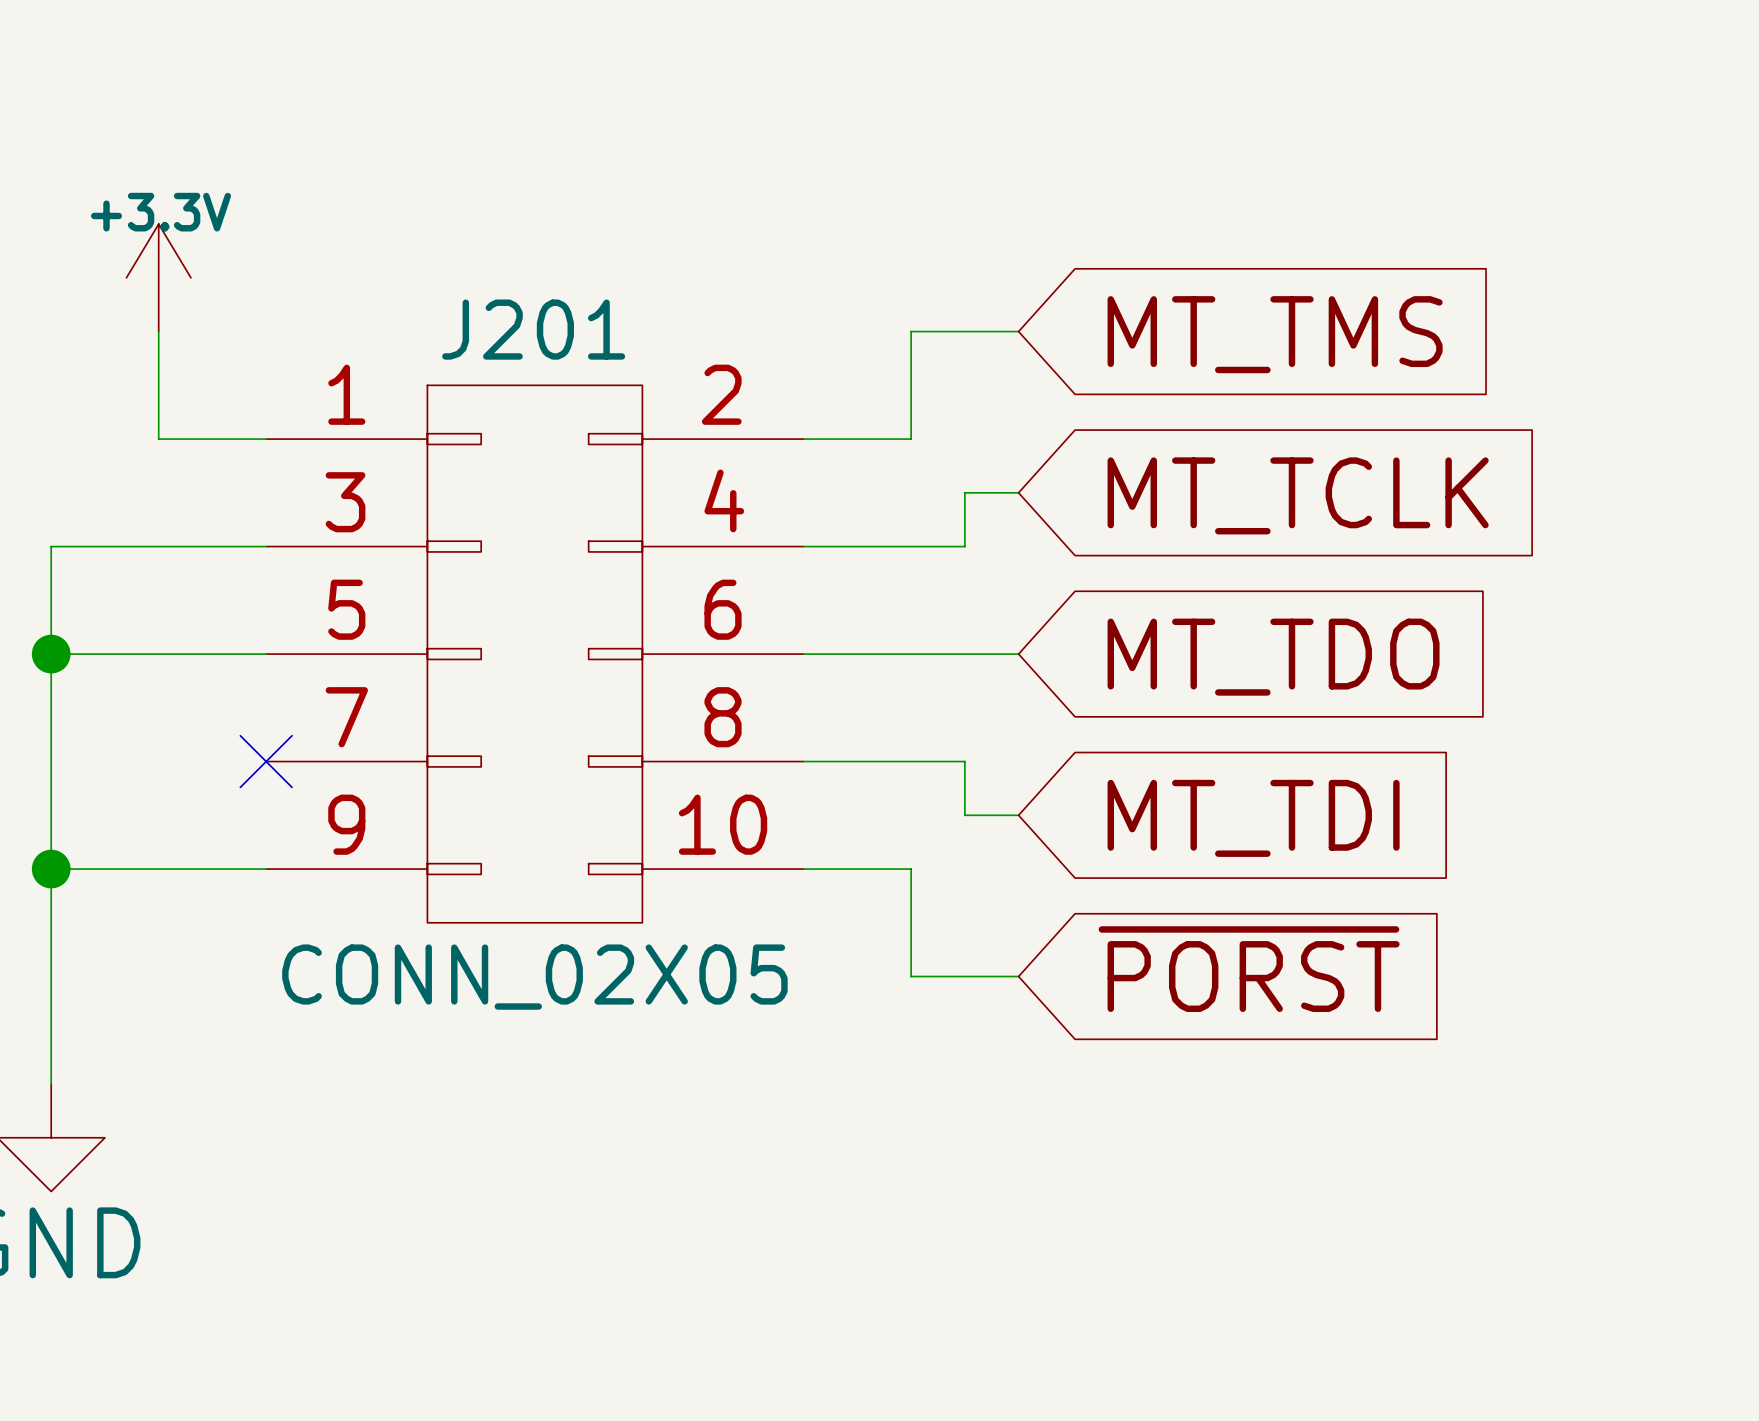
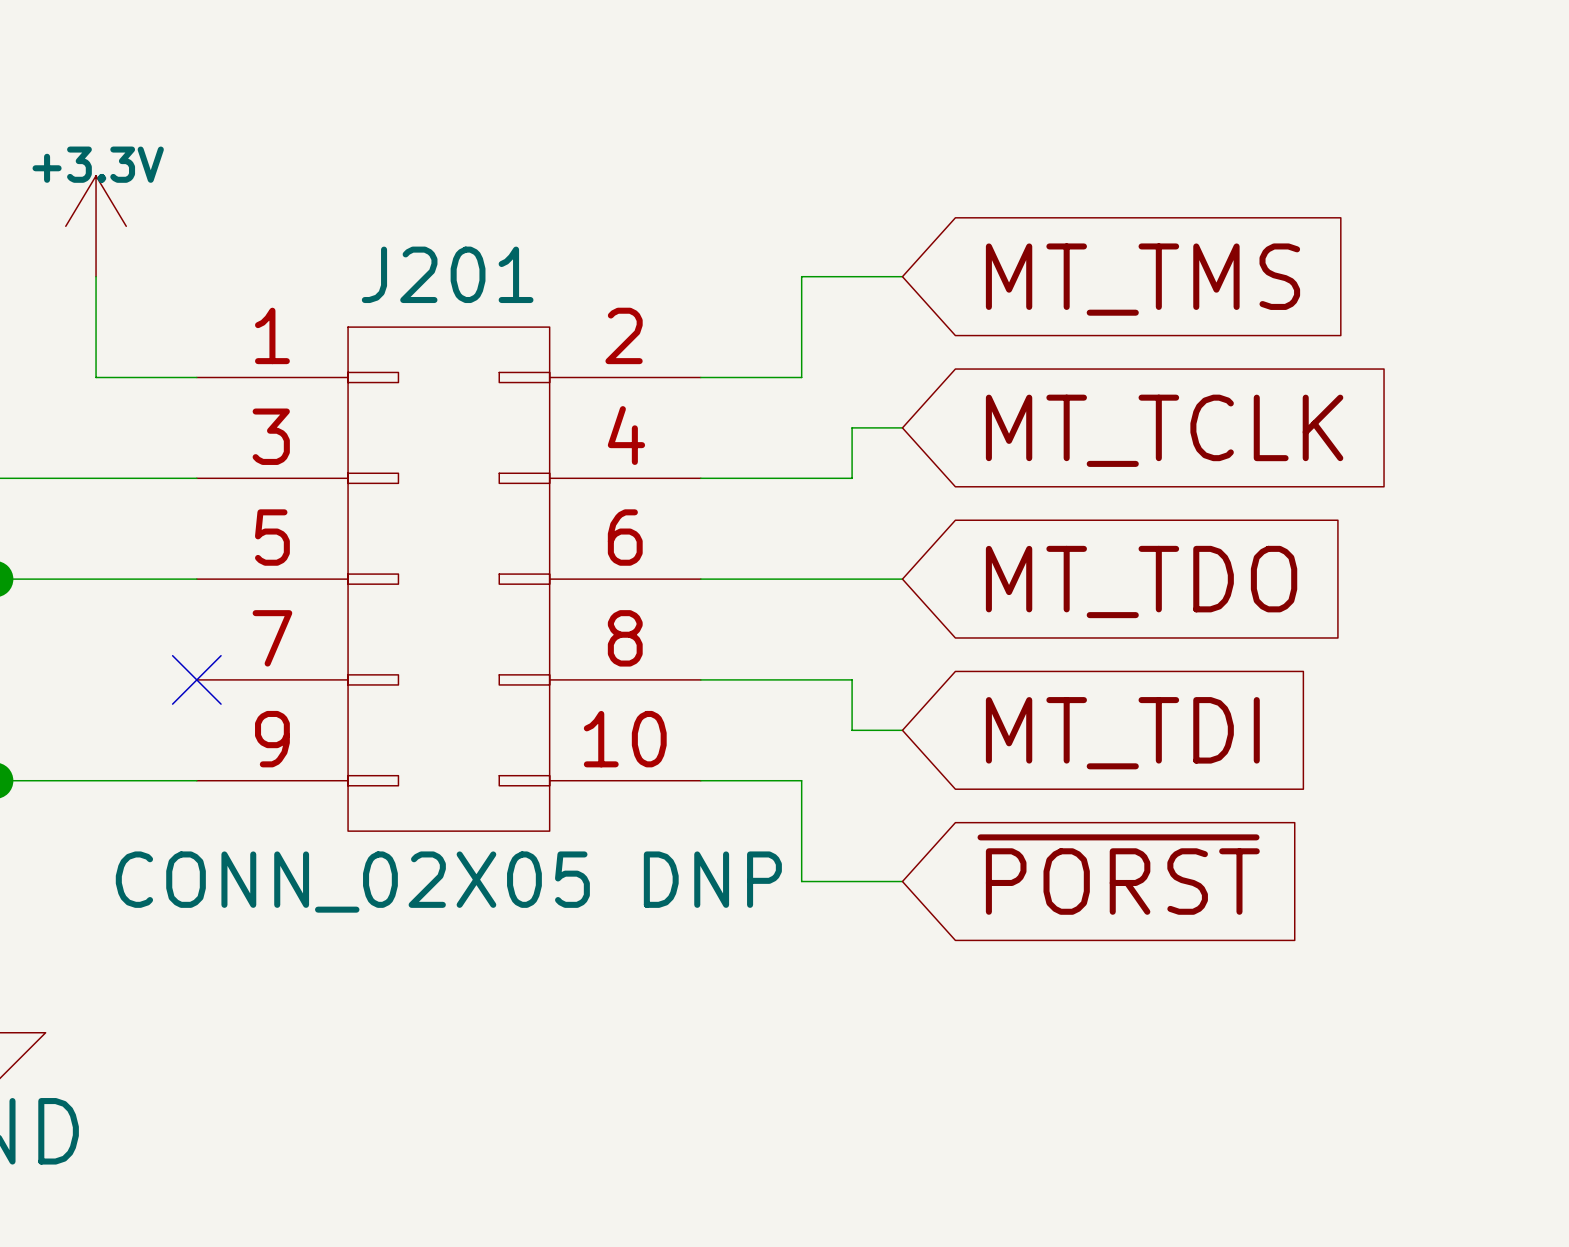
J201 value: CONN_02X05 (534, 977) -> CONN_02X05 DNP (448, 882)

